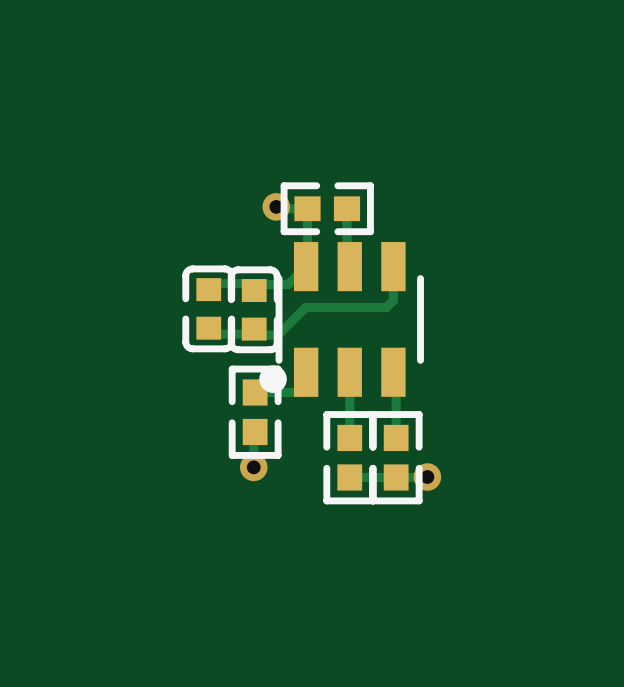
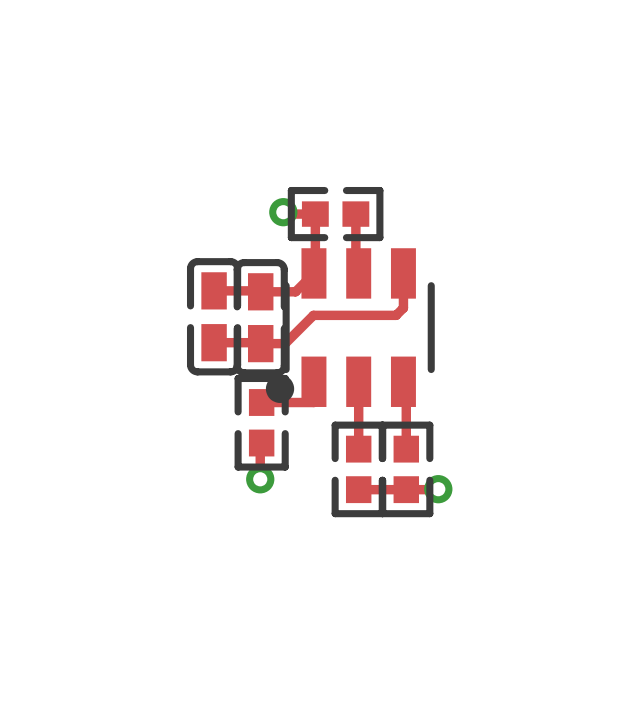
part footprint: [182, 265, 236, 353] -> [186, 258, 242, 376]
part footprint: [227, 266, 281, 354] -> [233, 259, 288, 377]

